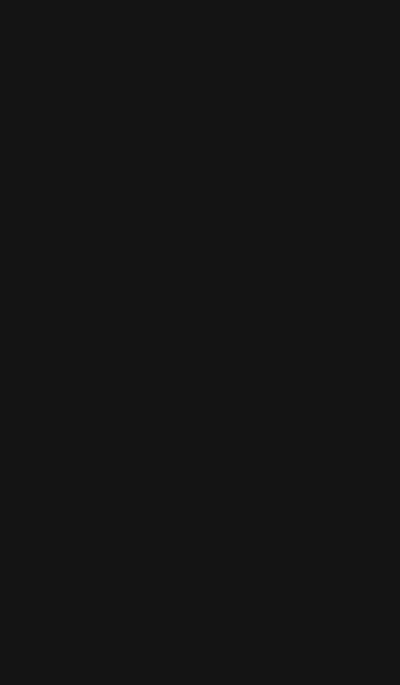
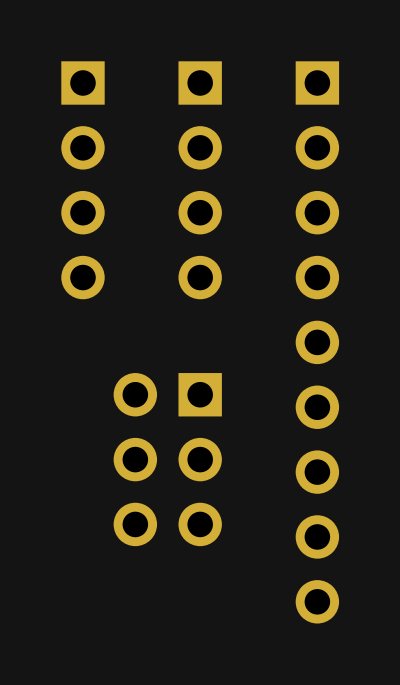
part: none -> (82, 180)
part: none -> (200, 180)
part: none -> (317, 342)
part: none -> (167, 459)

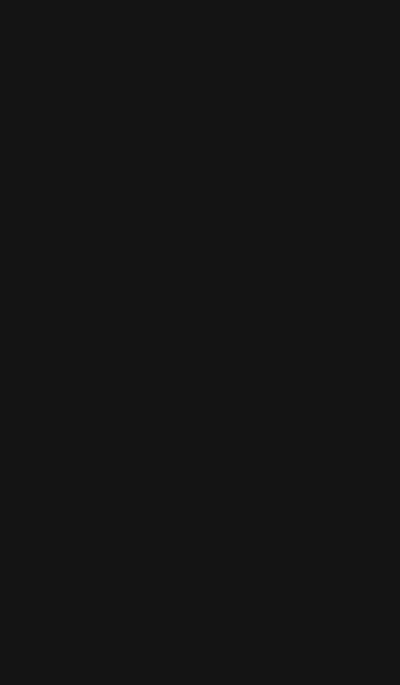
part: (82, 180) -> none
part: (200, 180) -> none
part: (317, 342) -> none
part: (167, 459) -> none

